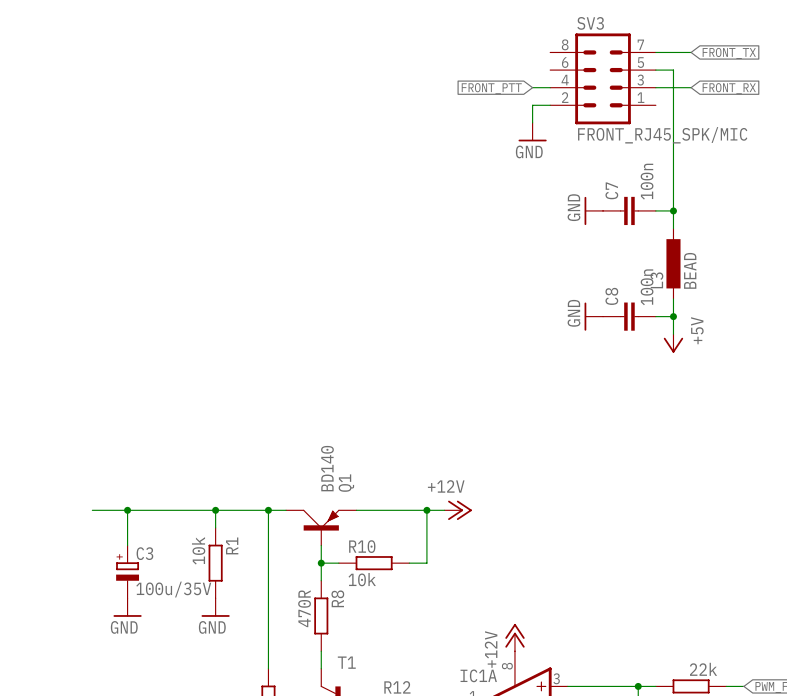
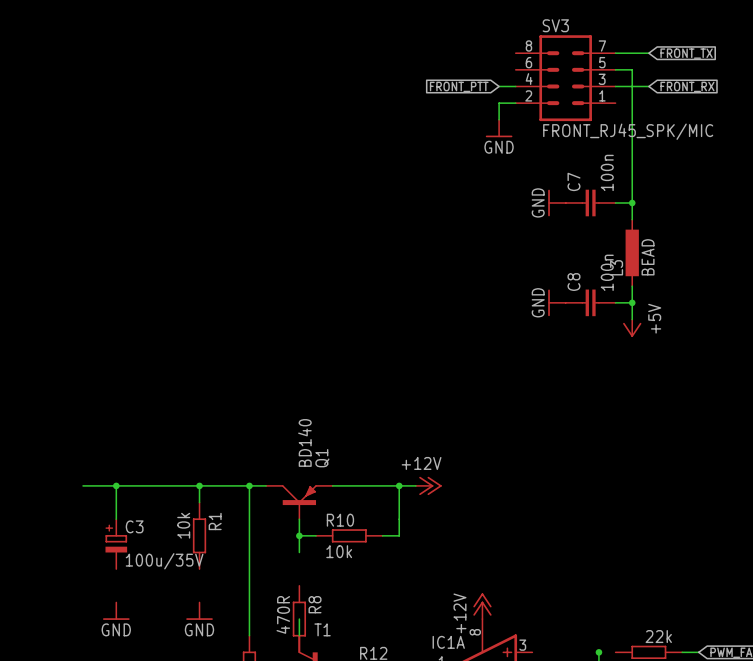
power symbol position: GND (127, 607) -> GND (116, 611)
power symbol position: GND (215, 607) -> GND (199, 611)
R8 position: (321, 615) -> (299, 619)
wire: (567, 686) (655, 686) -> none

